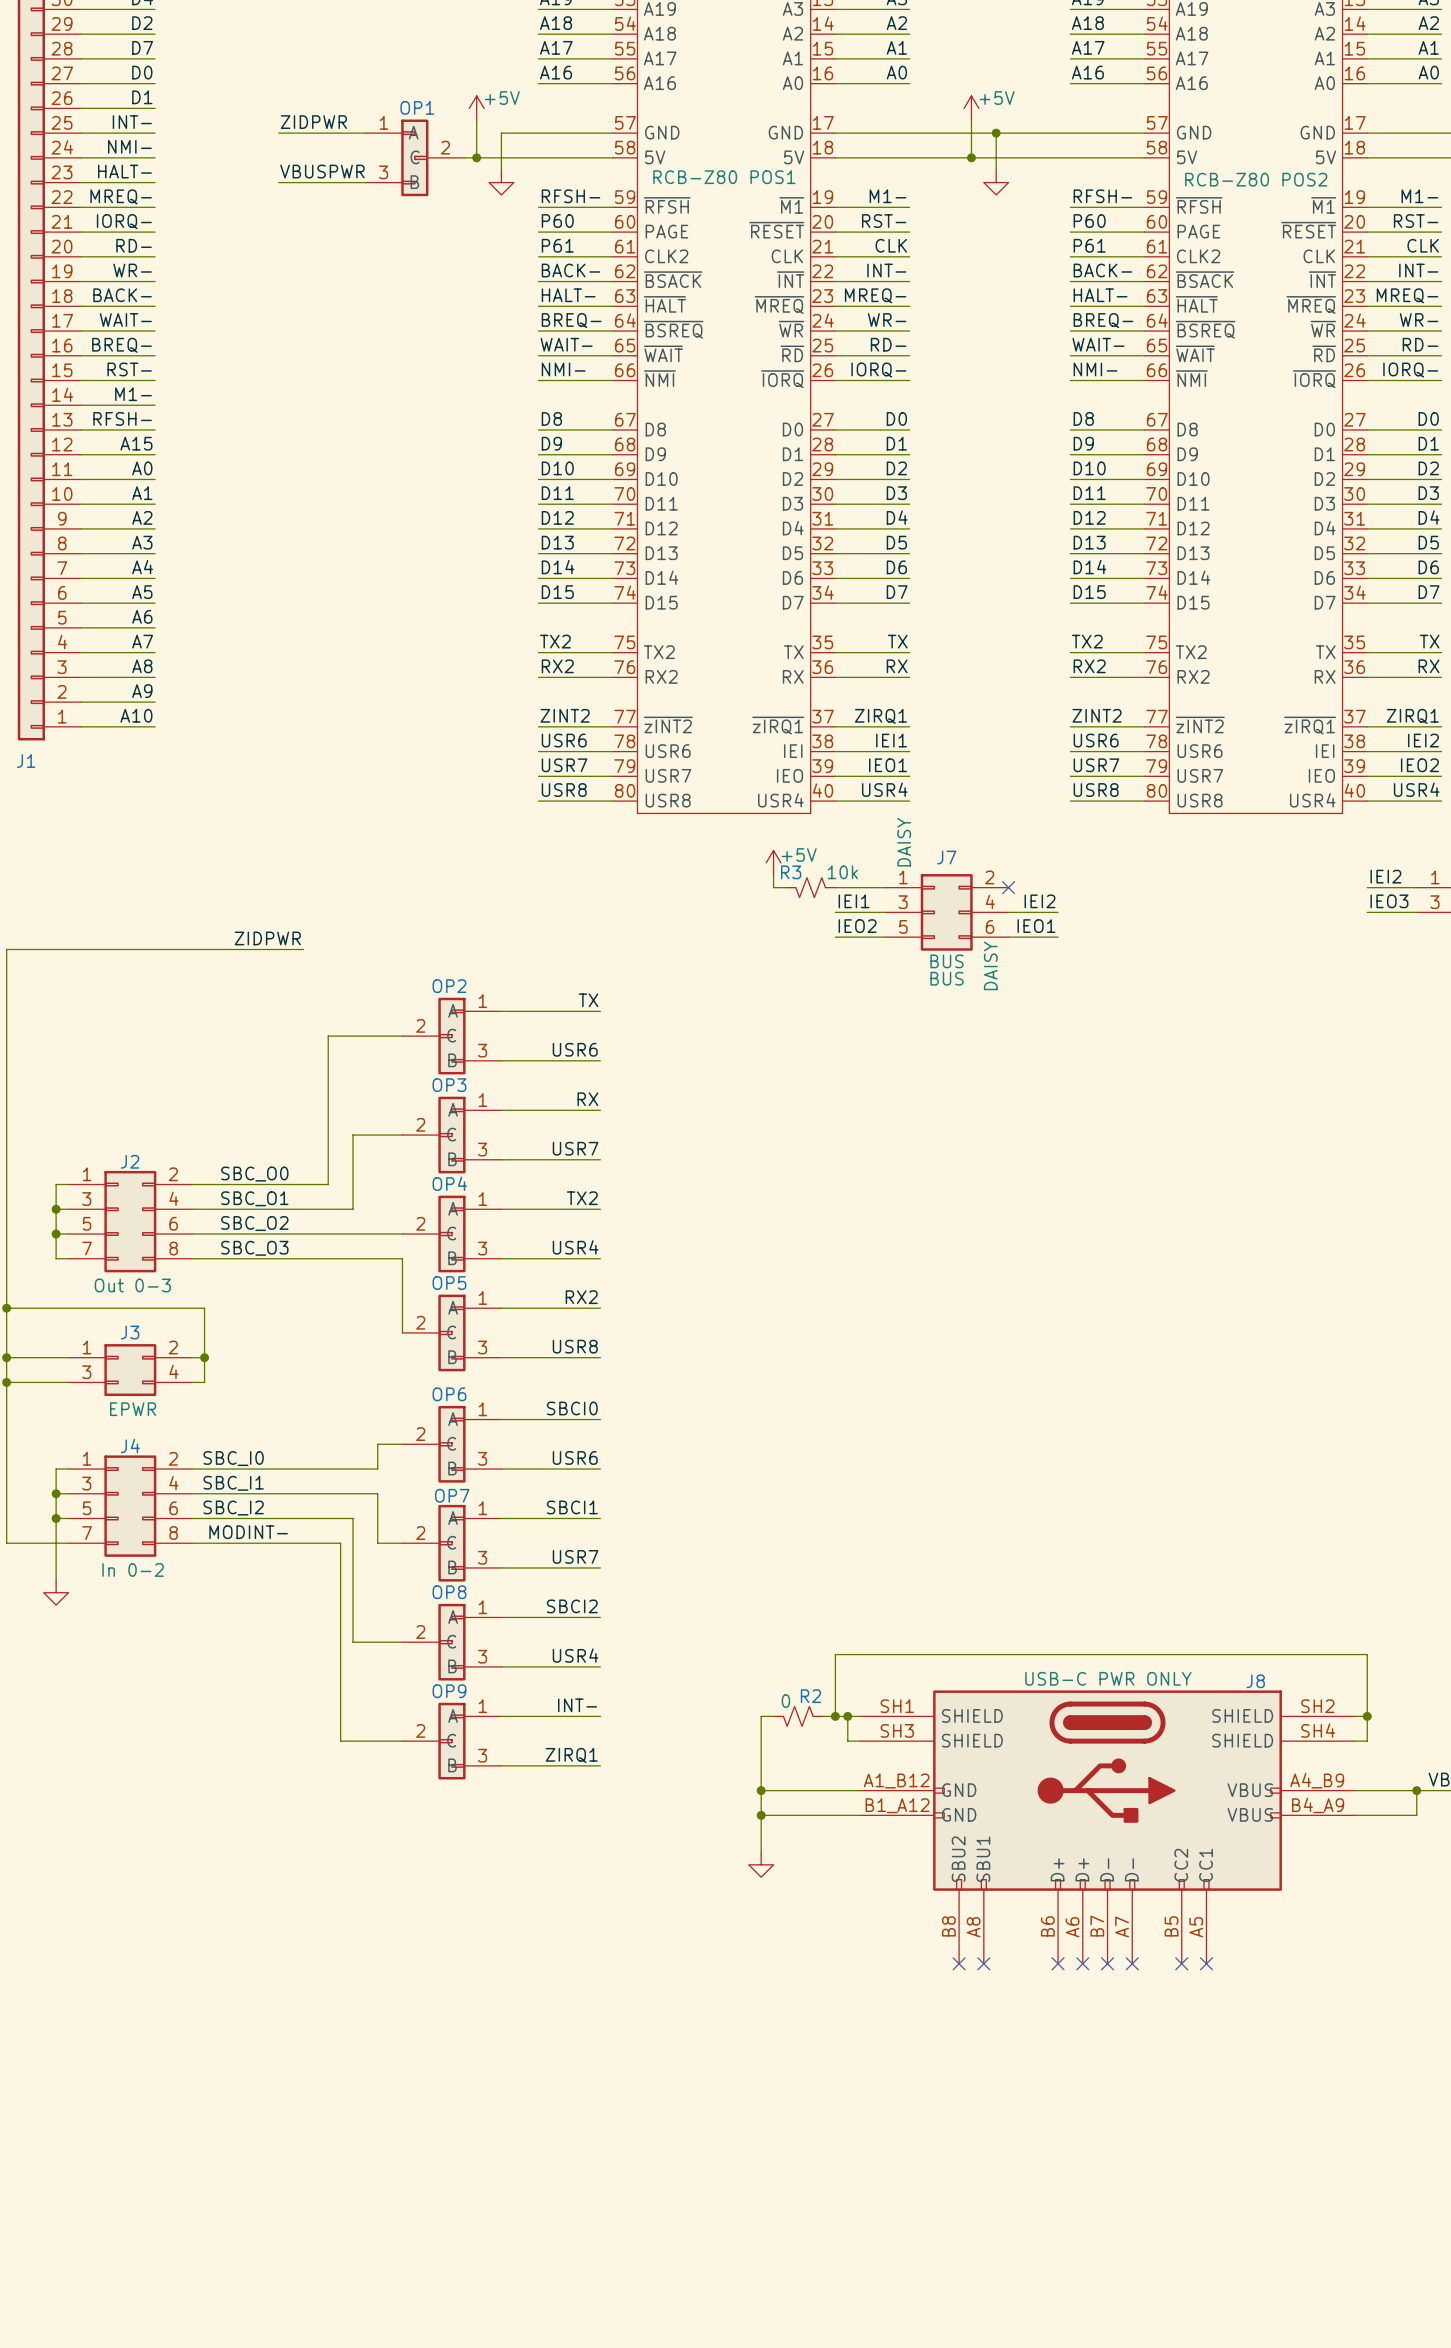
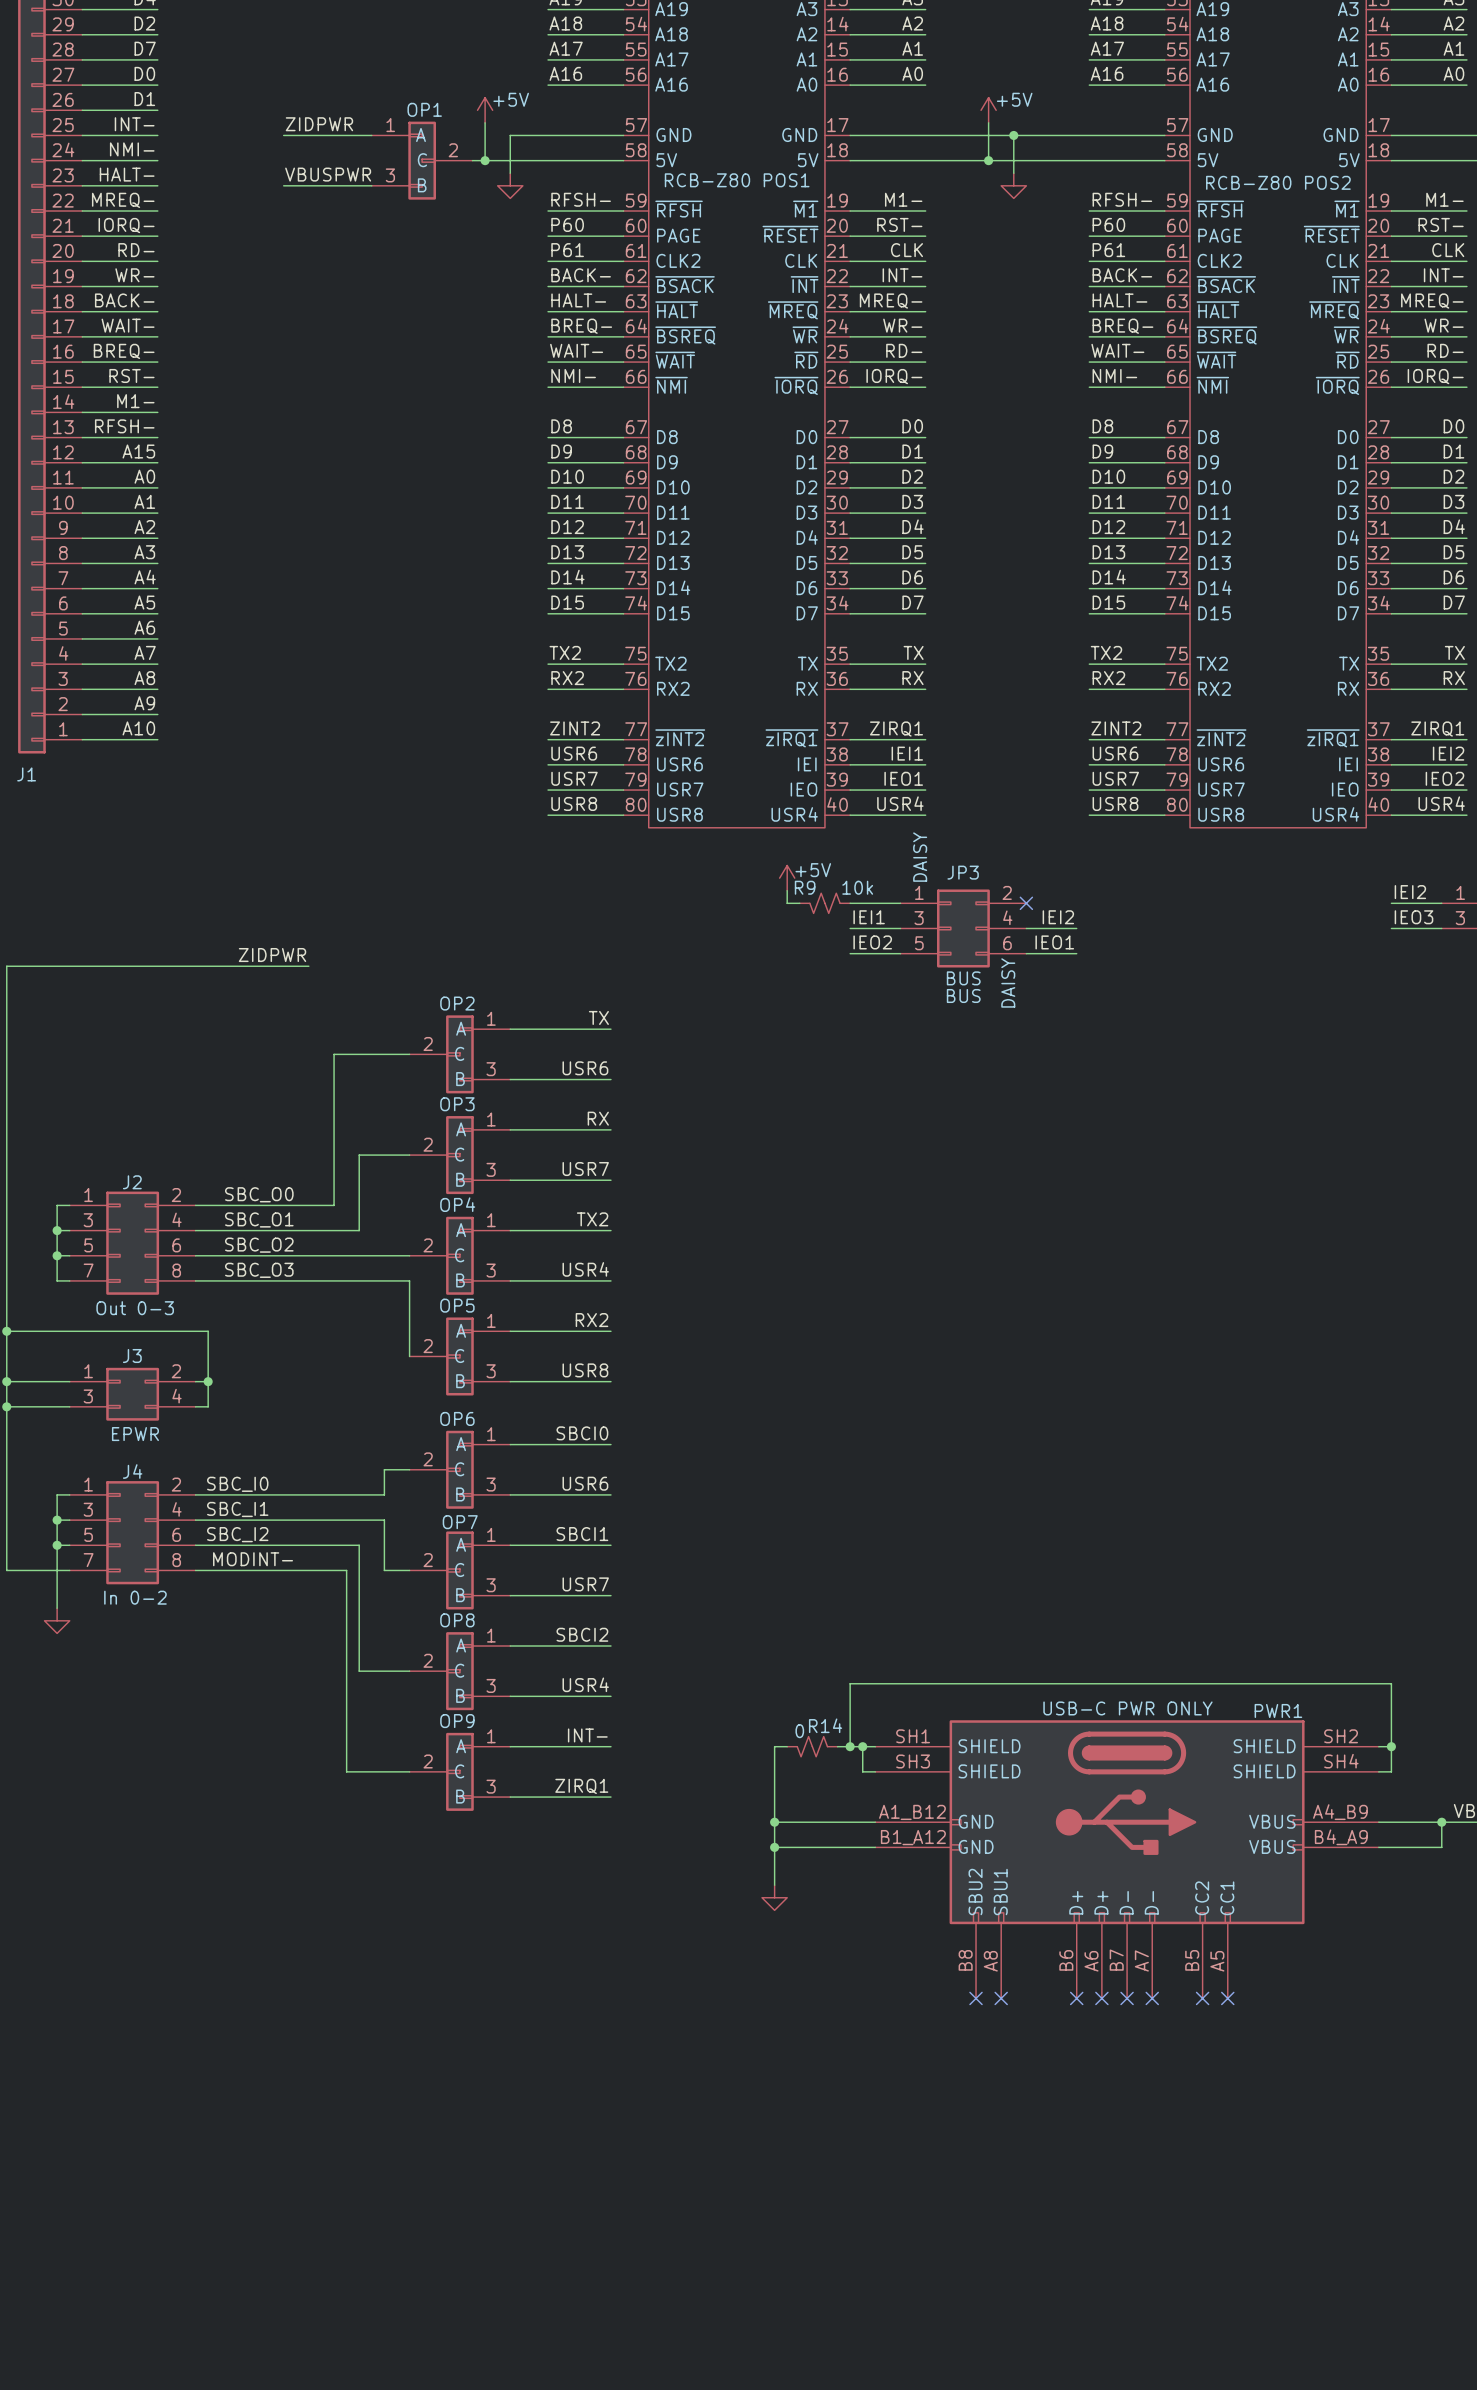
J7 name: J7 (946, 857) -> JP3 (963, 872)
R3 name: R3 (791, 872) -> R9 (805, 887)
J8 name: J8 (1255, 1681) -> PWR1 (1278, 1710)
R2 name: R2 (810, 1696) -> R14 (825, 1725)

